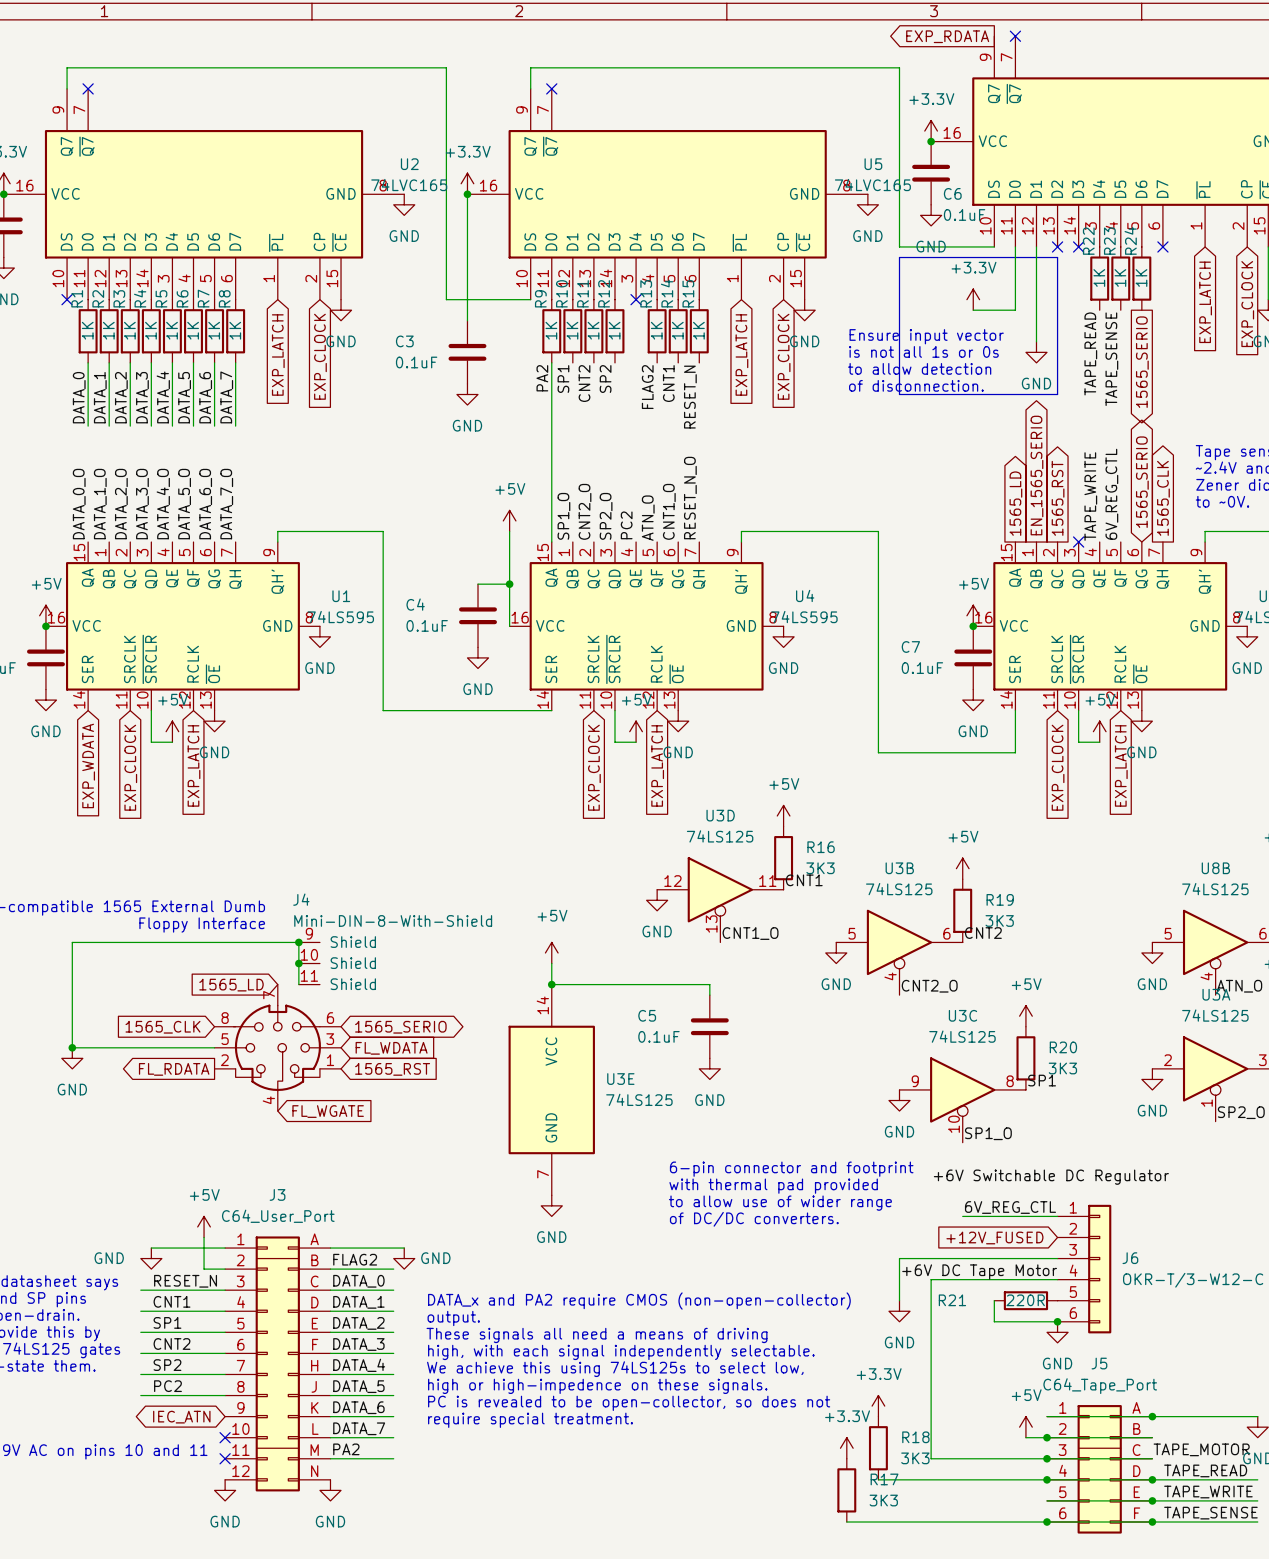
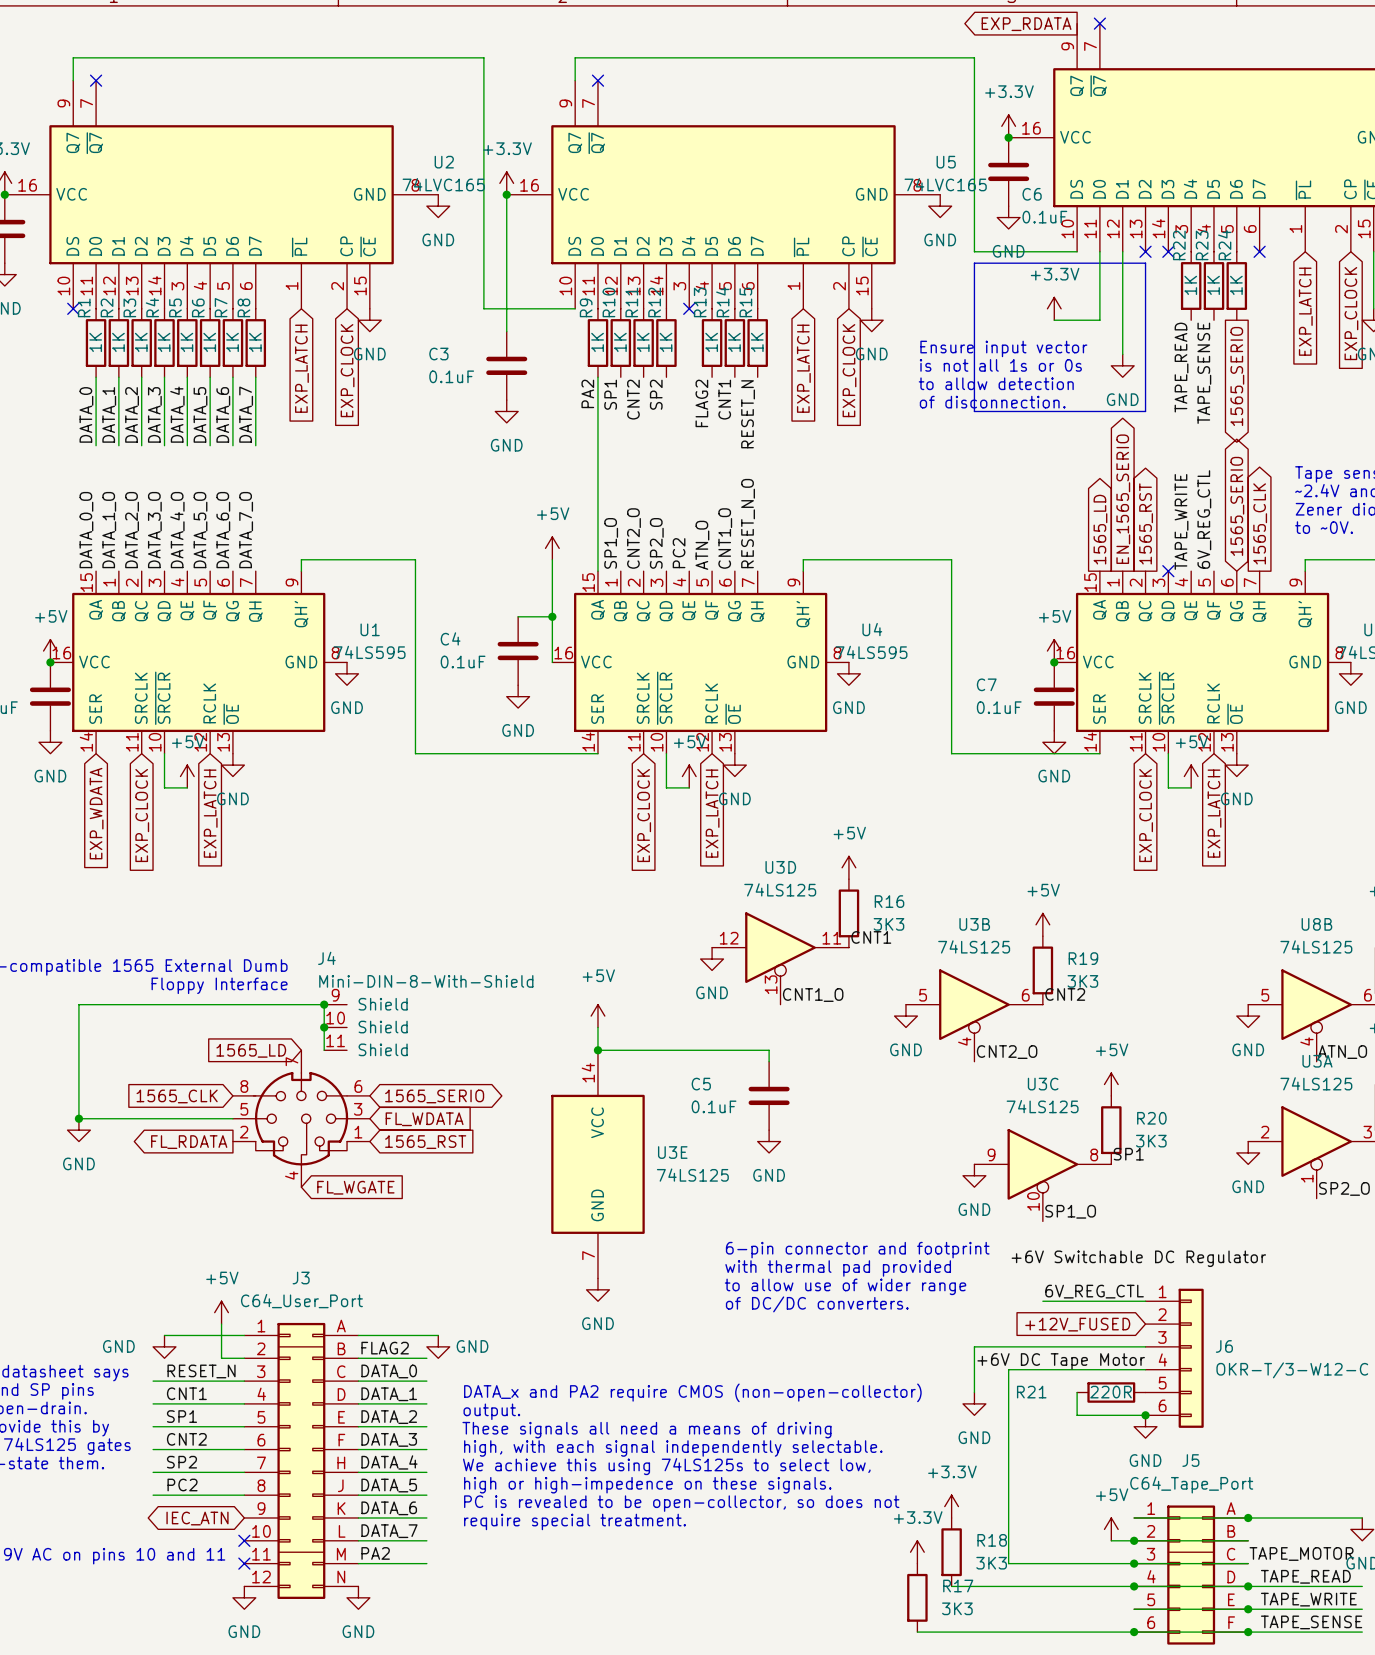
wire: (878, 710) (878, 752) (1015, 752) (1015, 710) -> (951, 753) (1099, 753)

